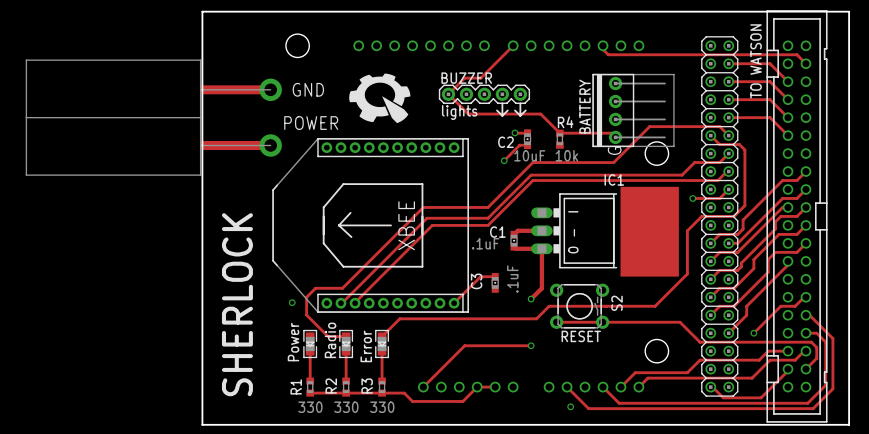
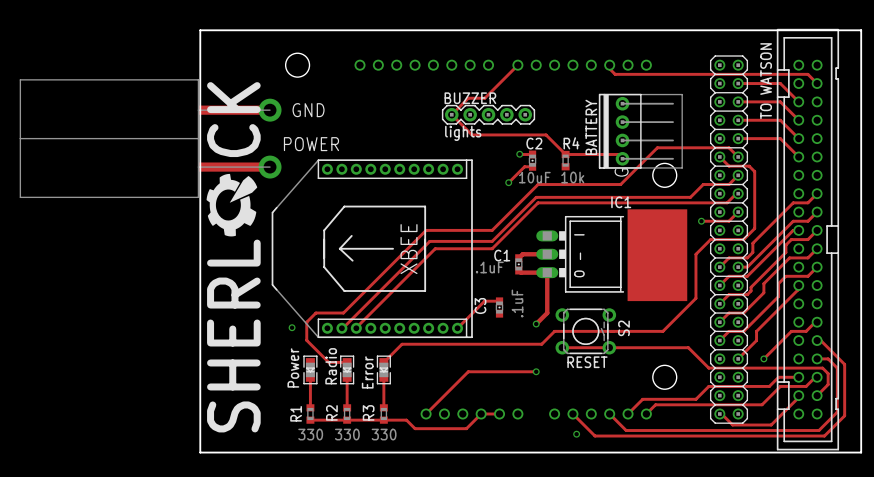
drawing: [349, 73, 411, 124] -> none
line: (502, 103) (502, 115) -> none
line: (520, 103) (520, 115) -> none
line: (497, 110) (502, 115) -> none
line: (507, 110) (502, 115) -> none
line: (514, 110) (520, 115) -> none
line: (525, 110) (520, 115) -> none
C2 name position: C2 (505, 142) -> C2 (534, 143)
drawing: none -> [206, 173, 258, 237]
text: SHERLOCK (237, 304) -> none

